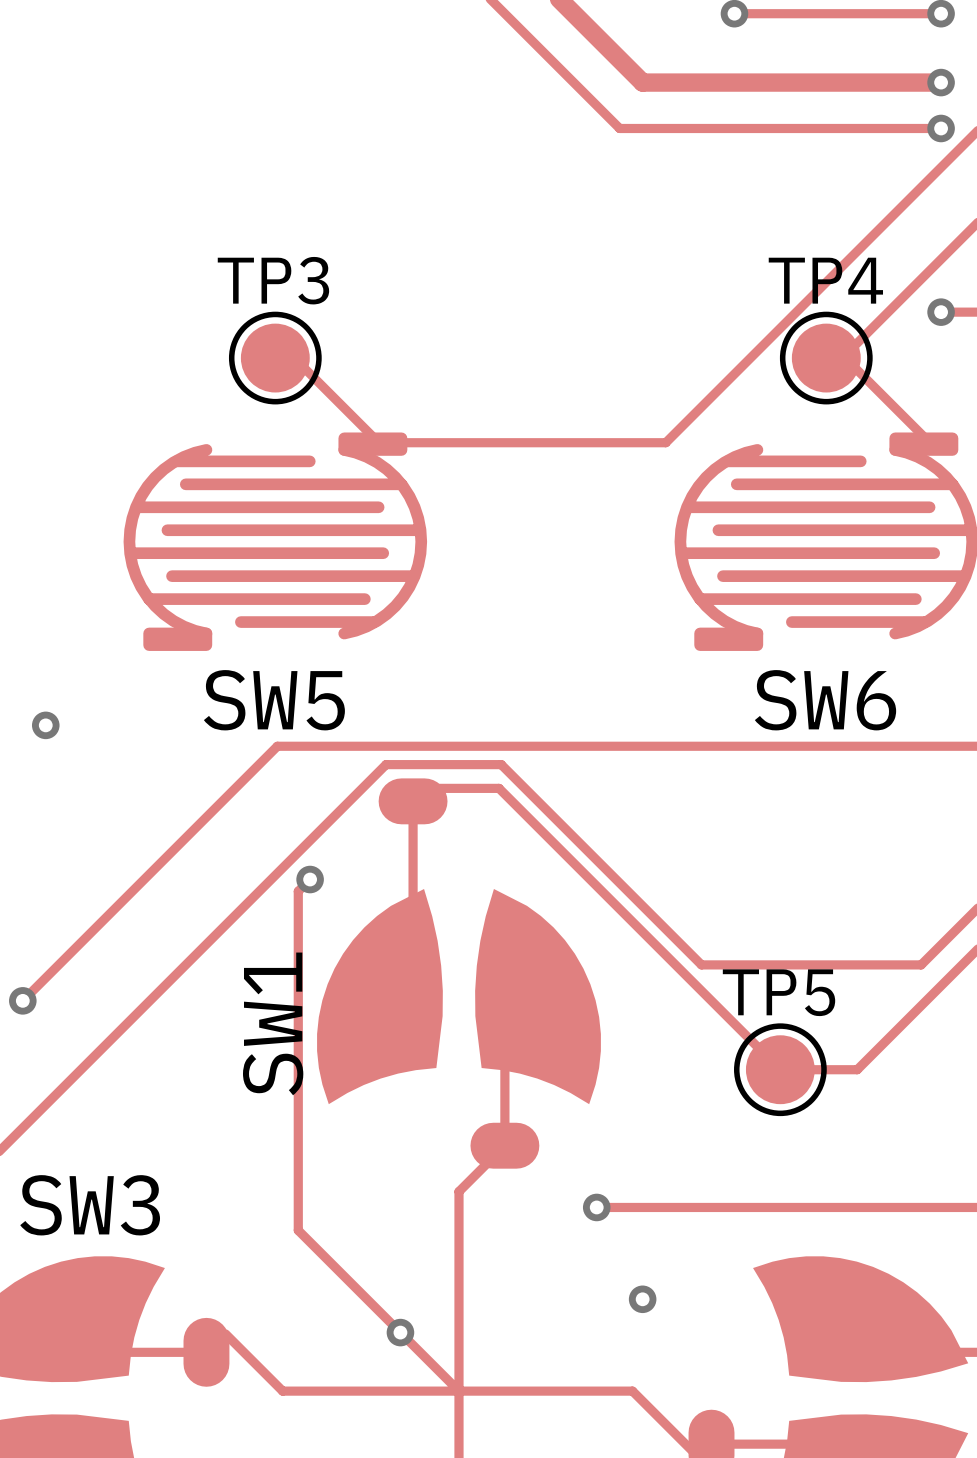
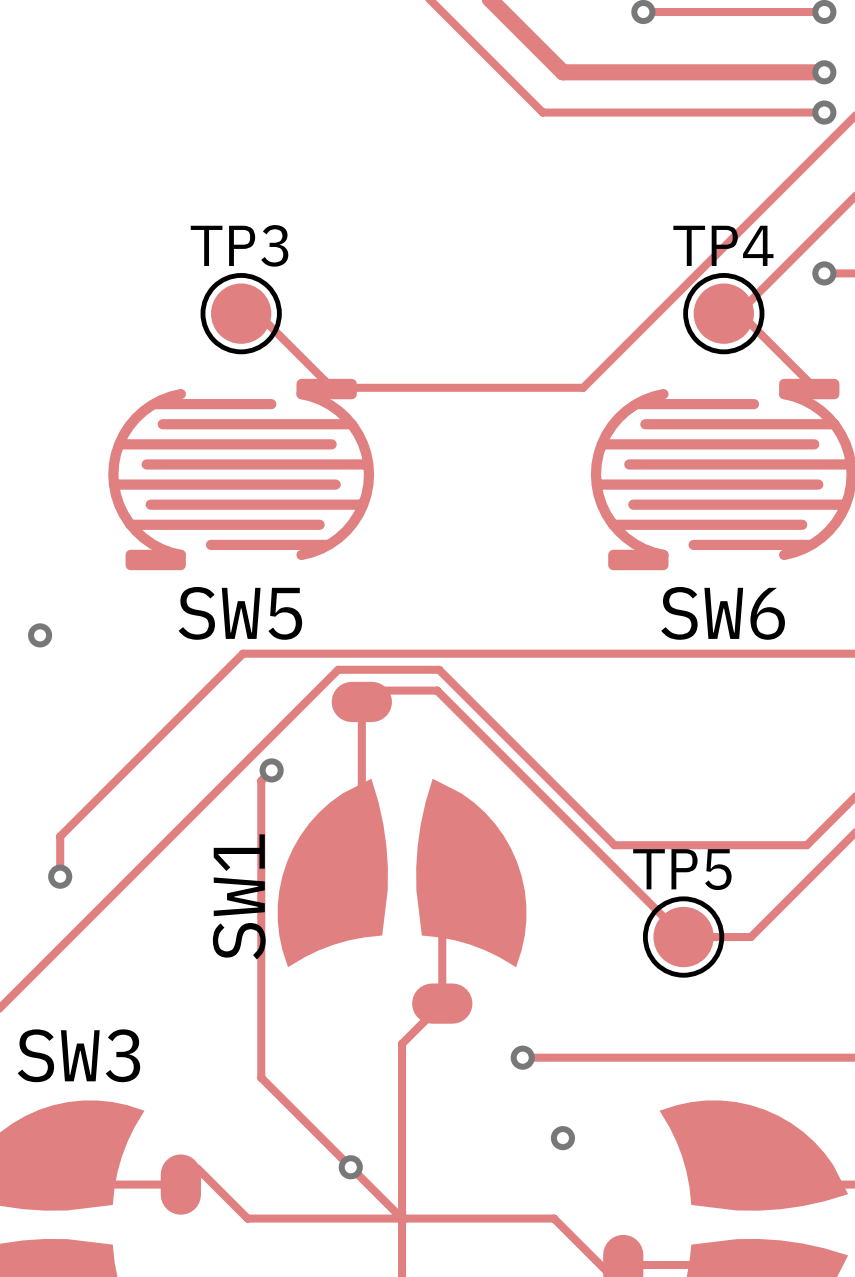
track: (68, 954) (22, 1000) -> (60, 836) (60, 876)
via position: (22, 1000) -> (60, 876)

